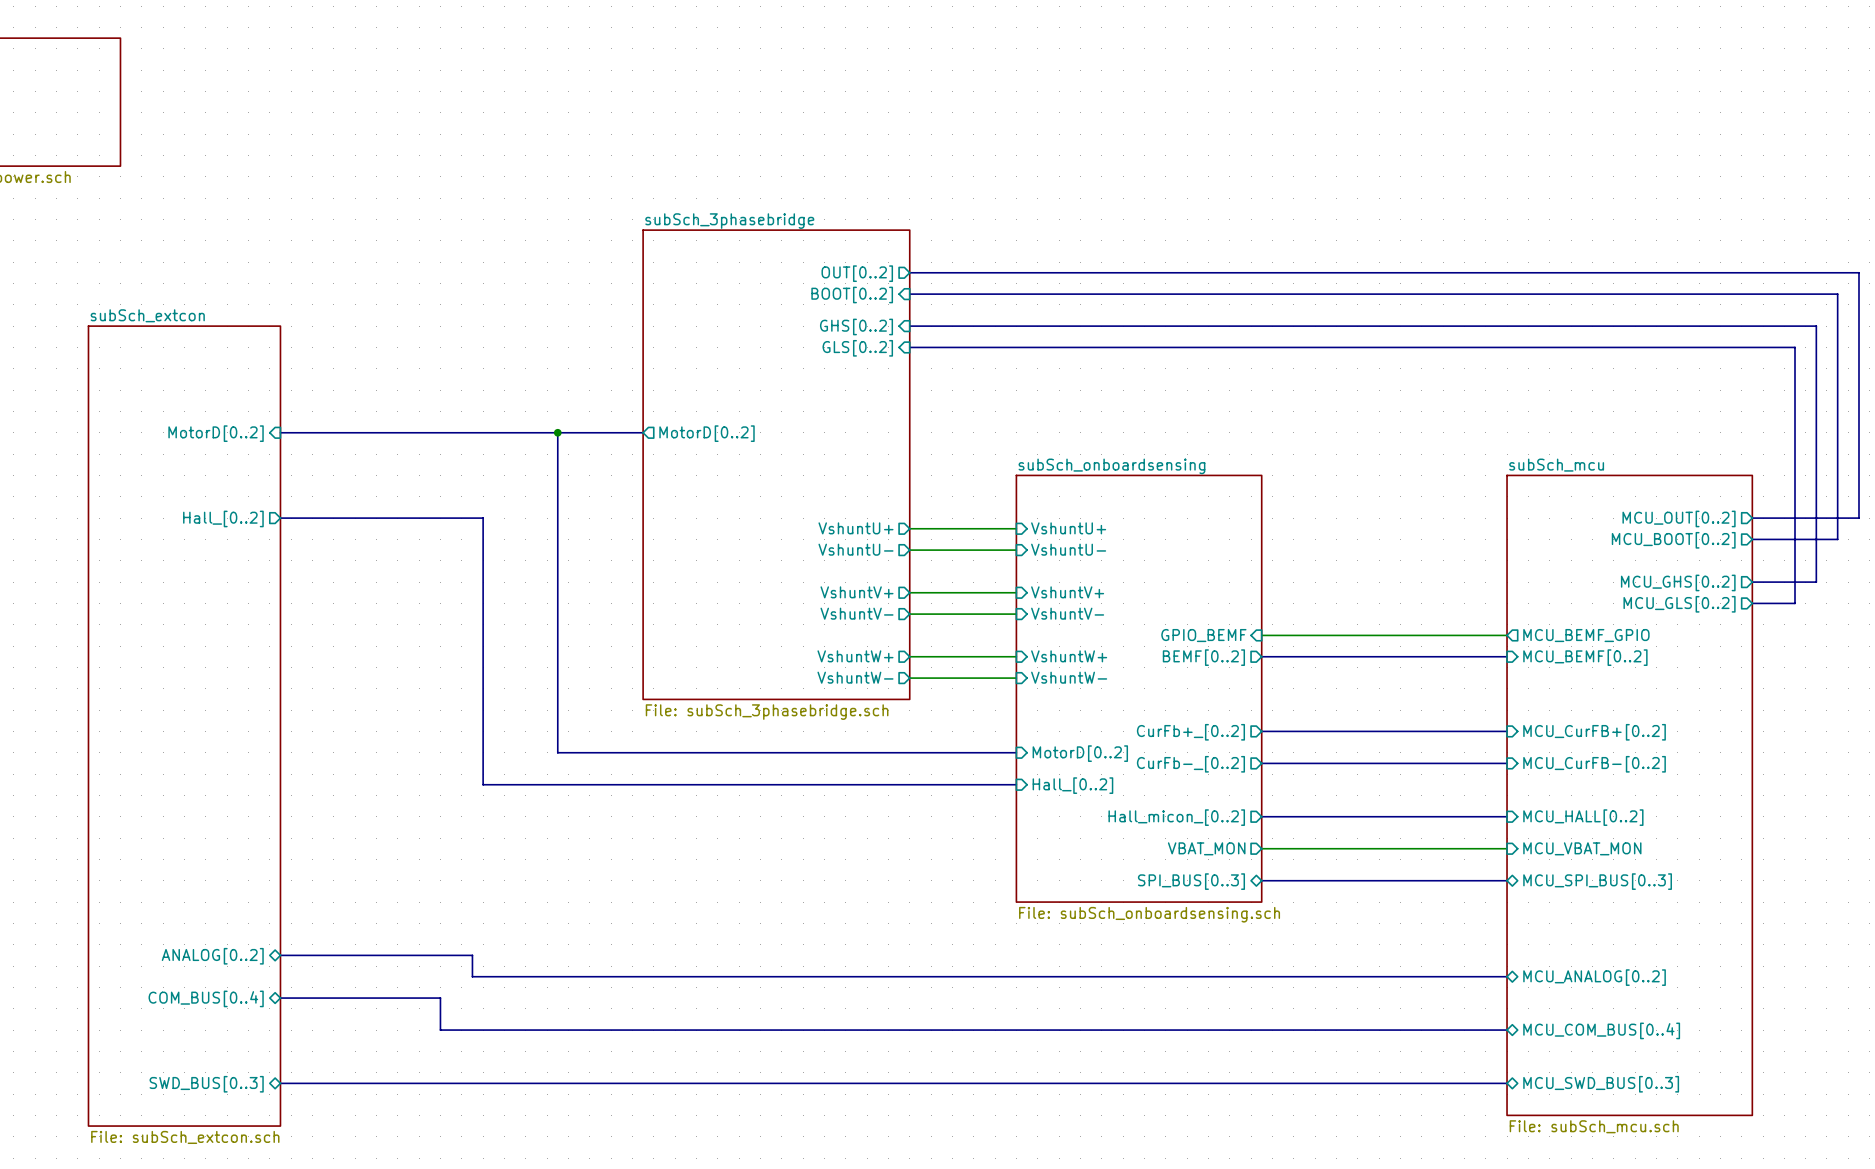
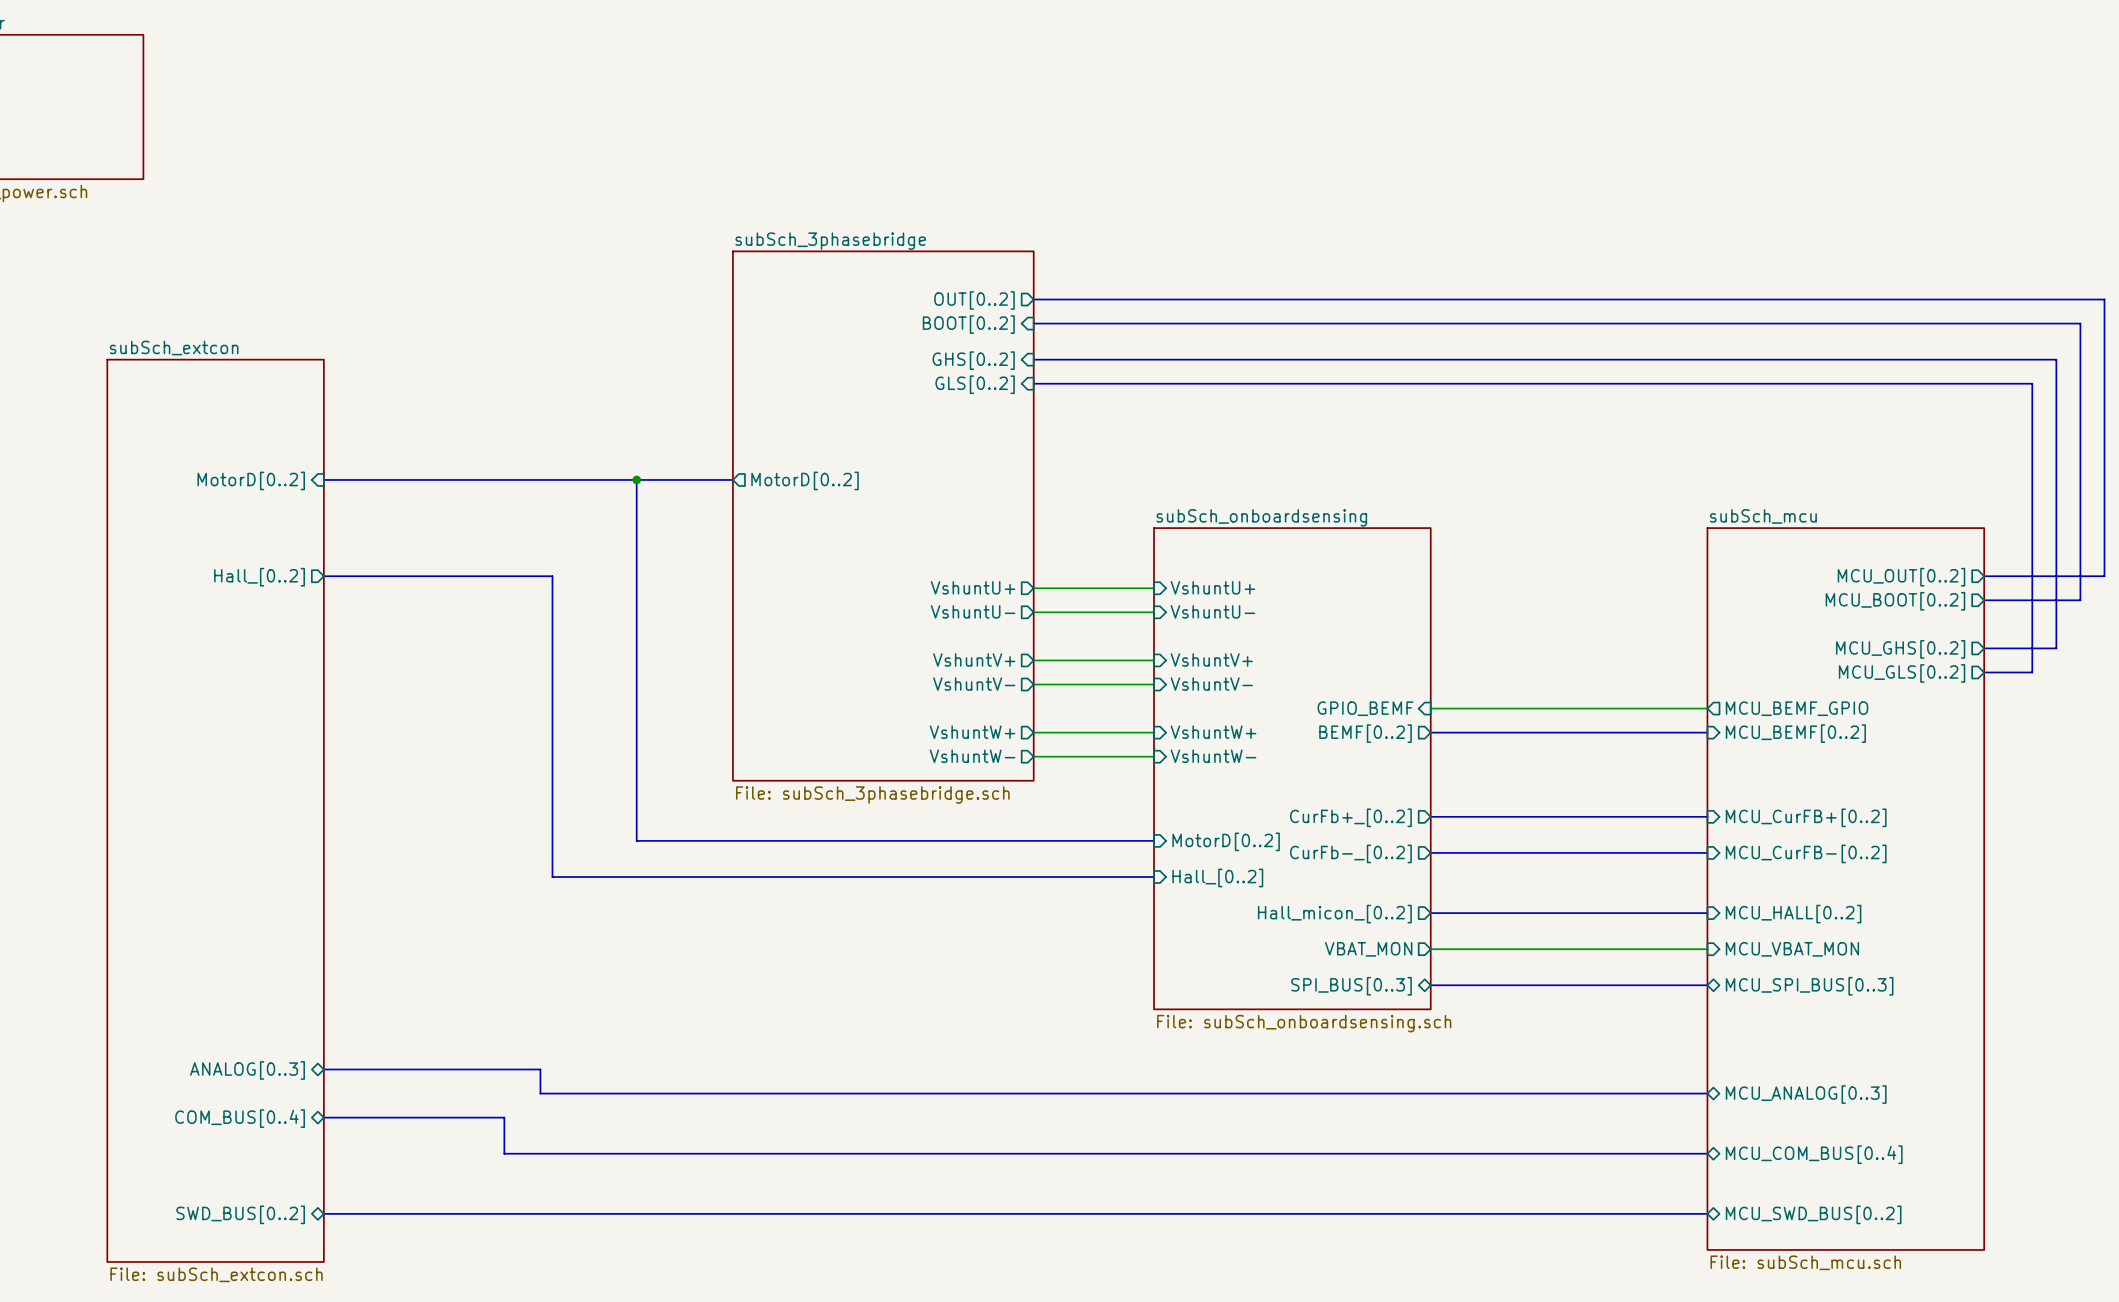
sheet pin: ANALOG[0..2] (212, 956) -> ANALOG[0..3] (247, 1070)
sheet pin: MCU_ANALOG[0..2] (1594, 977) -> MCU_ANALOG[0..3] (1806, 1094)
sheet pin: SWD_BUS[0..3] (206, 1084) -> SWD_BUS[0..2] (240, 1214)
sheet pin: MCU_SWD_BUS[0..3] (1601, 1084) -> MCU_SWD_BUS[0..2] (1813, 1214)

